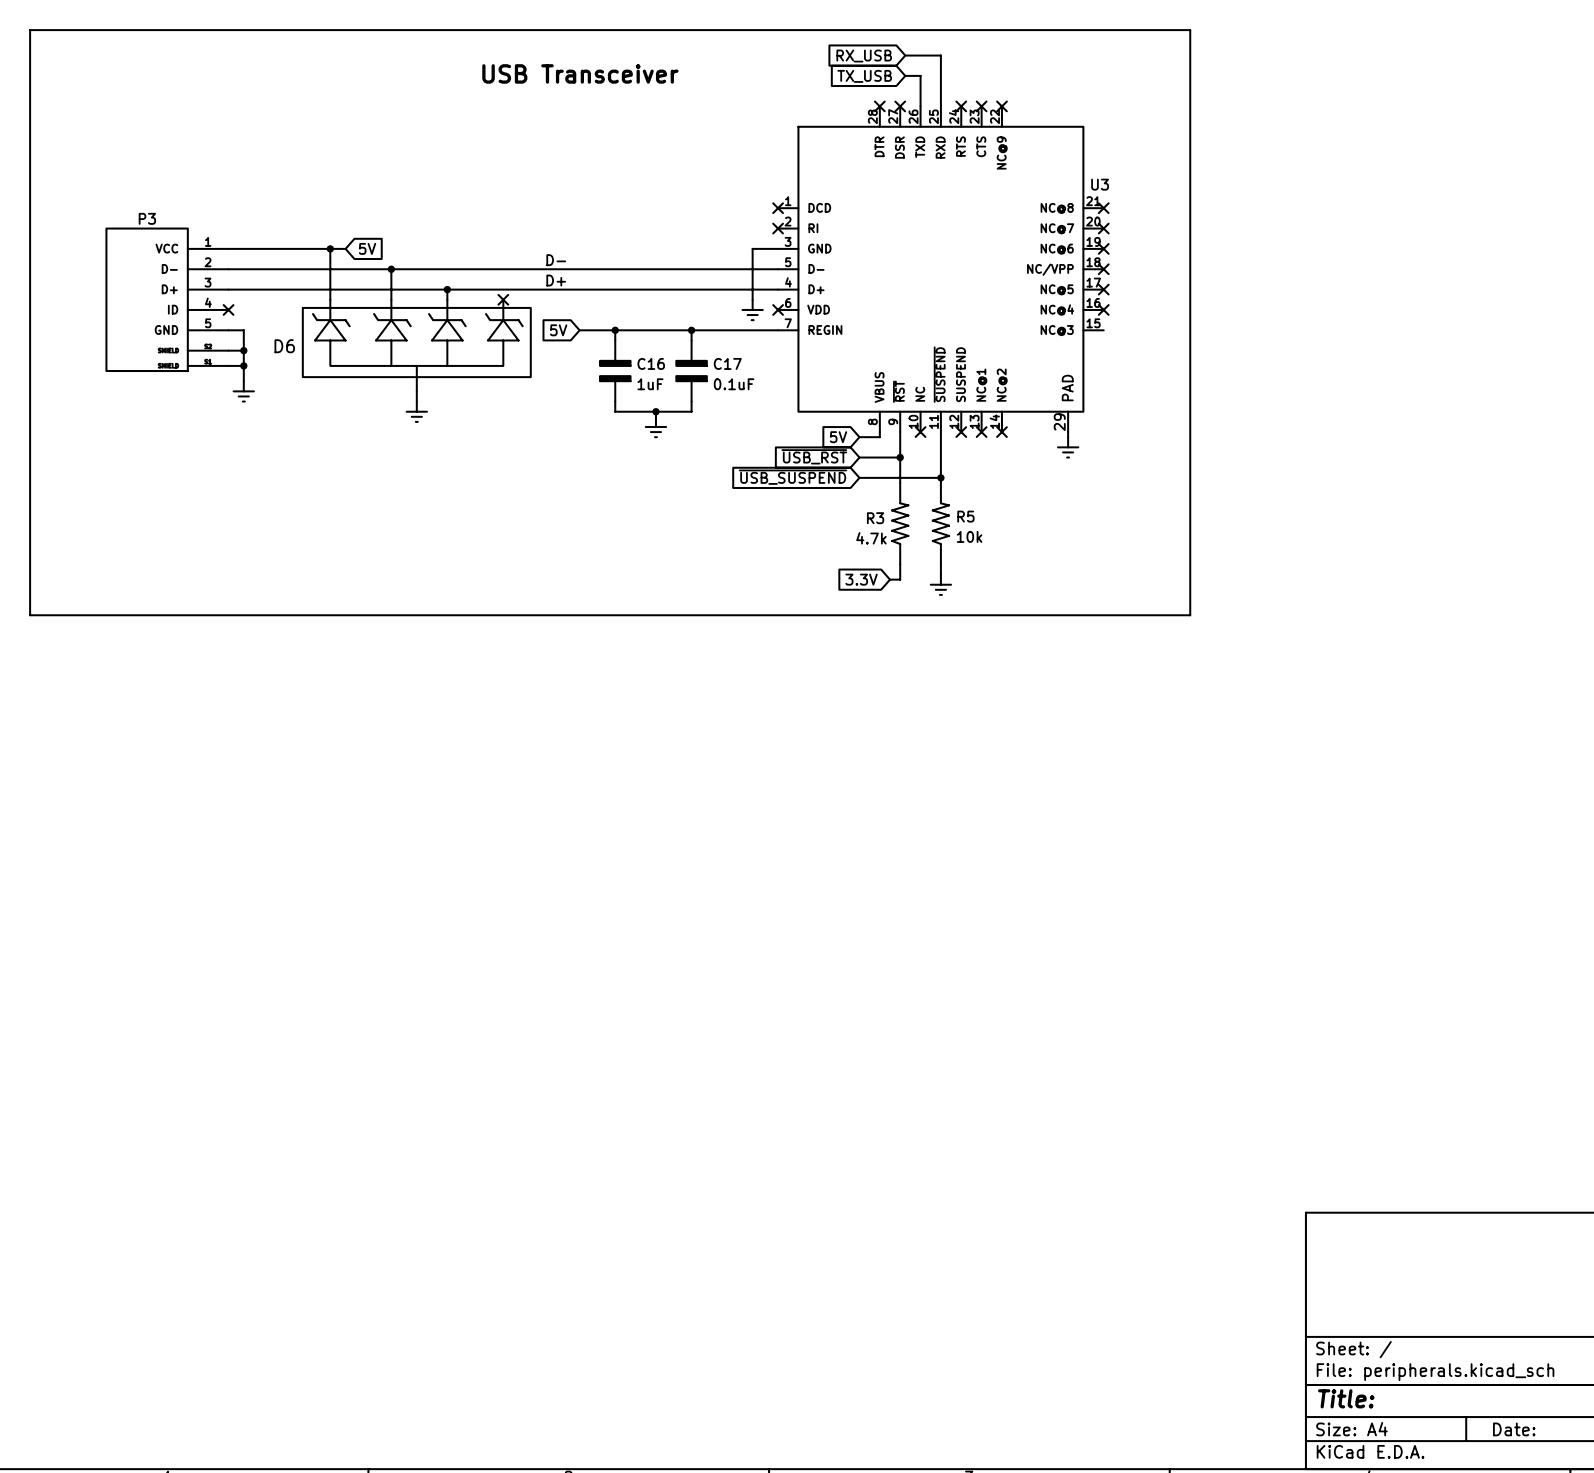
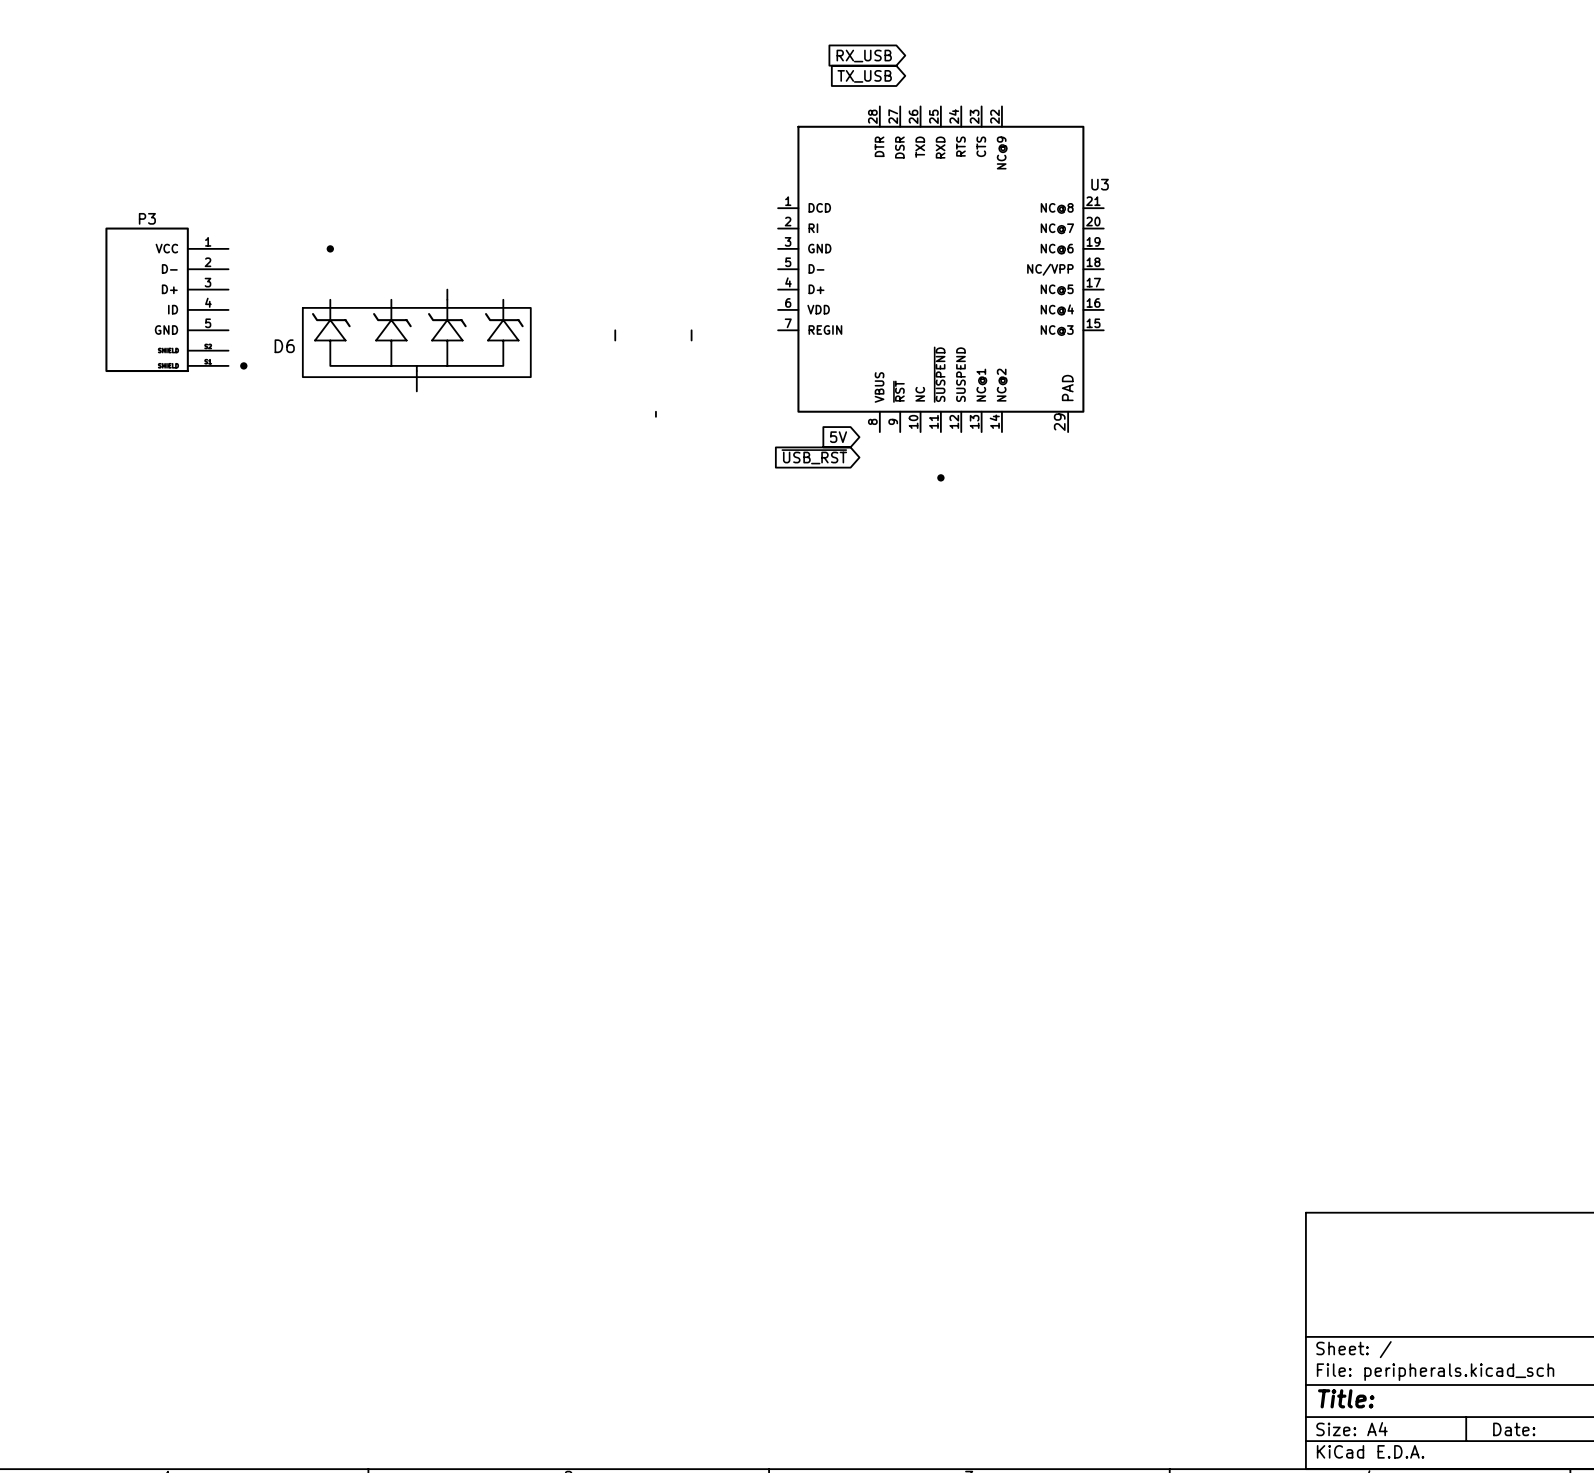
line: (30, 30) (30, 615) (1190, 615) (1190, 30) (30, 30) -> none
wire: (905, 55) (940, 55) (940, 106) -> none
text: USB Transceiver (580, 73) -> none
wire: (905, 75) (920, 75) (920, 106) -> none
no-connect mark: (879, 106) -> none
no-connect mark: (900, 106) -> none
no-connect mark: (961, 106) -> none
no-connect mark: (981, 106) -> none
no-connect mark: (1001, 106) -> none
no-connect mark: (778, 208) -> none
no-connect mark: (1103, 208) -> none
no-connect mark: (778, 228) -> none
no-connect mark: (1103, 228) -> none
wire: (228, 248) (345, 248) -> none
wire: (330, 248) (330, 299) -> none
global label: 5V (367, 248) -> none
wire: (778, 248) (752, 248) (752, 299) -> none
no-connect mark: (1103, 248) -> none
label: D- (556, 260) -> none
wire: (228, 269) (778, 269) -> none
wire: (391, 269) (391, 299) -> none
junction: (391, 269) -> none
no-connect mark: (1103, 269) -> none
label: D+ (556, 280) -> none
wire: (228, 289) (778, 289) -> none
junction: (447, 289) -> none
no-connect mark: (1103, 289) -> none
no-connect mark: (503, 299) -> none
no-connect mark: (228, 309) -> none
power symbol: (752, 309) -> none
no-connect mark: (778, 309) -> none
no-connect mark: (1103, 309) -> none
wire: (228, 330) (243, 330) (243, 381) -> none
global label: 5V (558, 330) -> none
wire: (579, 330) (778, 330) -> none
junction: (615, 330) -> none
junction: (691, 330) -> none
wire: (228, 350) (243, 350) -> none
junction: (243, 350) -> none
wire: (228, 365) (243, 365) -> none
C16: 1uF (615, 371) -> none
C17: 0.1uF (691, 371) -> none
power symbol: (243, 391) -> none
wire: (416, 391) (416, 401) -> none
wire: (615, 401) (615, 411) (691, 411) (691, 401) -> none
power symbol: (416, 411) -> none
junction: (655, 411) -> none
power symbol: (655, 426) -> none
wire: (879, 432) (879, 437) (859, 437) -> none
wire: (900, 432) (900, 482) -> none
no-connect mark: (920, 432) -> none
wire: (940, 432) (940, 482) -> none
no-connect mark: (961, 432) -> none
no-connect mark: (981, 432) -> none
no-connect mark: (1001, 432) -> none
wire: (1068, 432) (1068, 437) -> none
power symbol: (1068, 447) -> none
wire: (859, 457) (900, 457) -> none
junction: (900, 457) -> none
global label: ~{USB_SUSPEND} (792, 477) -> none
wire: (859, 477) (940, 477) -> none
R3: 4.7k (900, 523) -> none
R5: 10k (940, 523) -> none
wire: (900, 564) (900, 579) (890, 579) -> none
wire: (940, 564) (940, 574) -> none
global label: 3.3V (861, 579) -> none
power symbol: (940, 584) -> none

